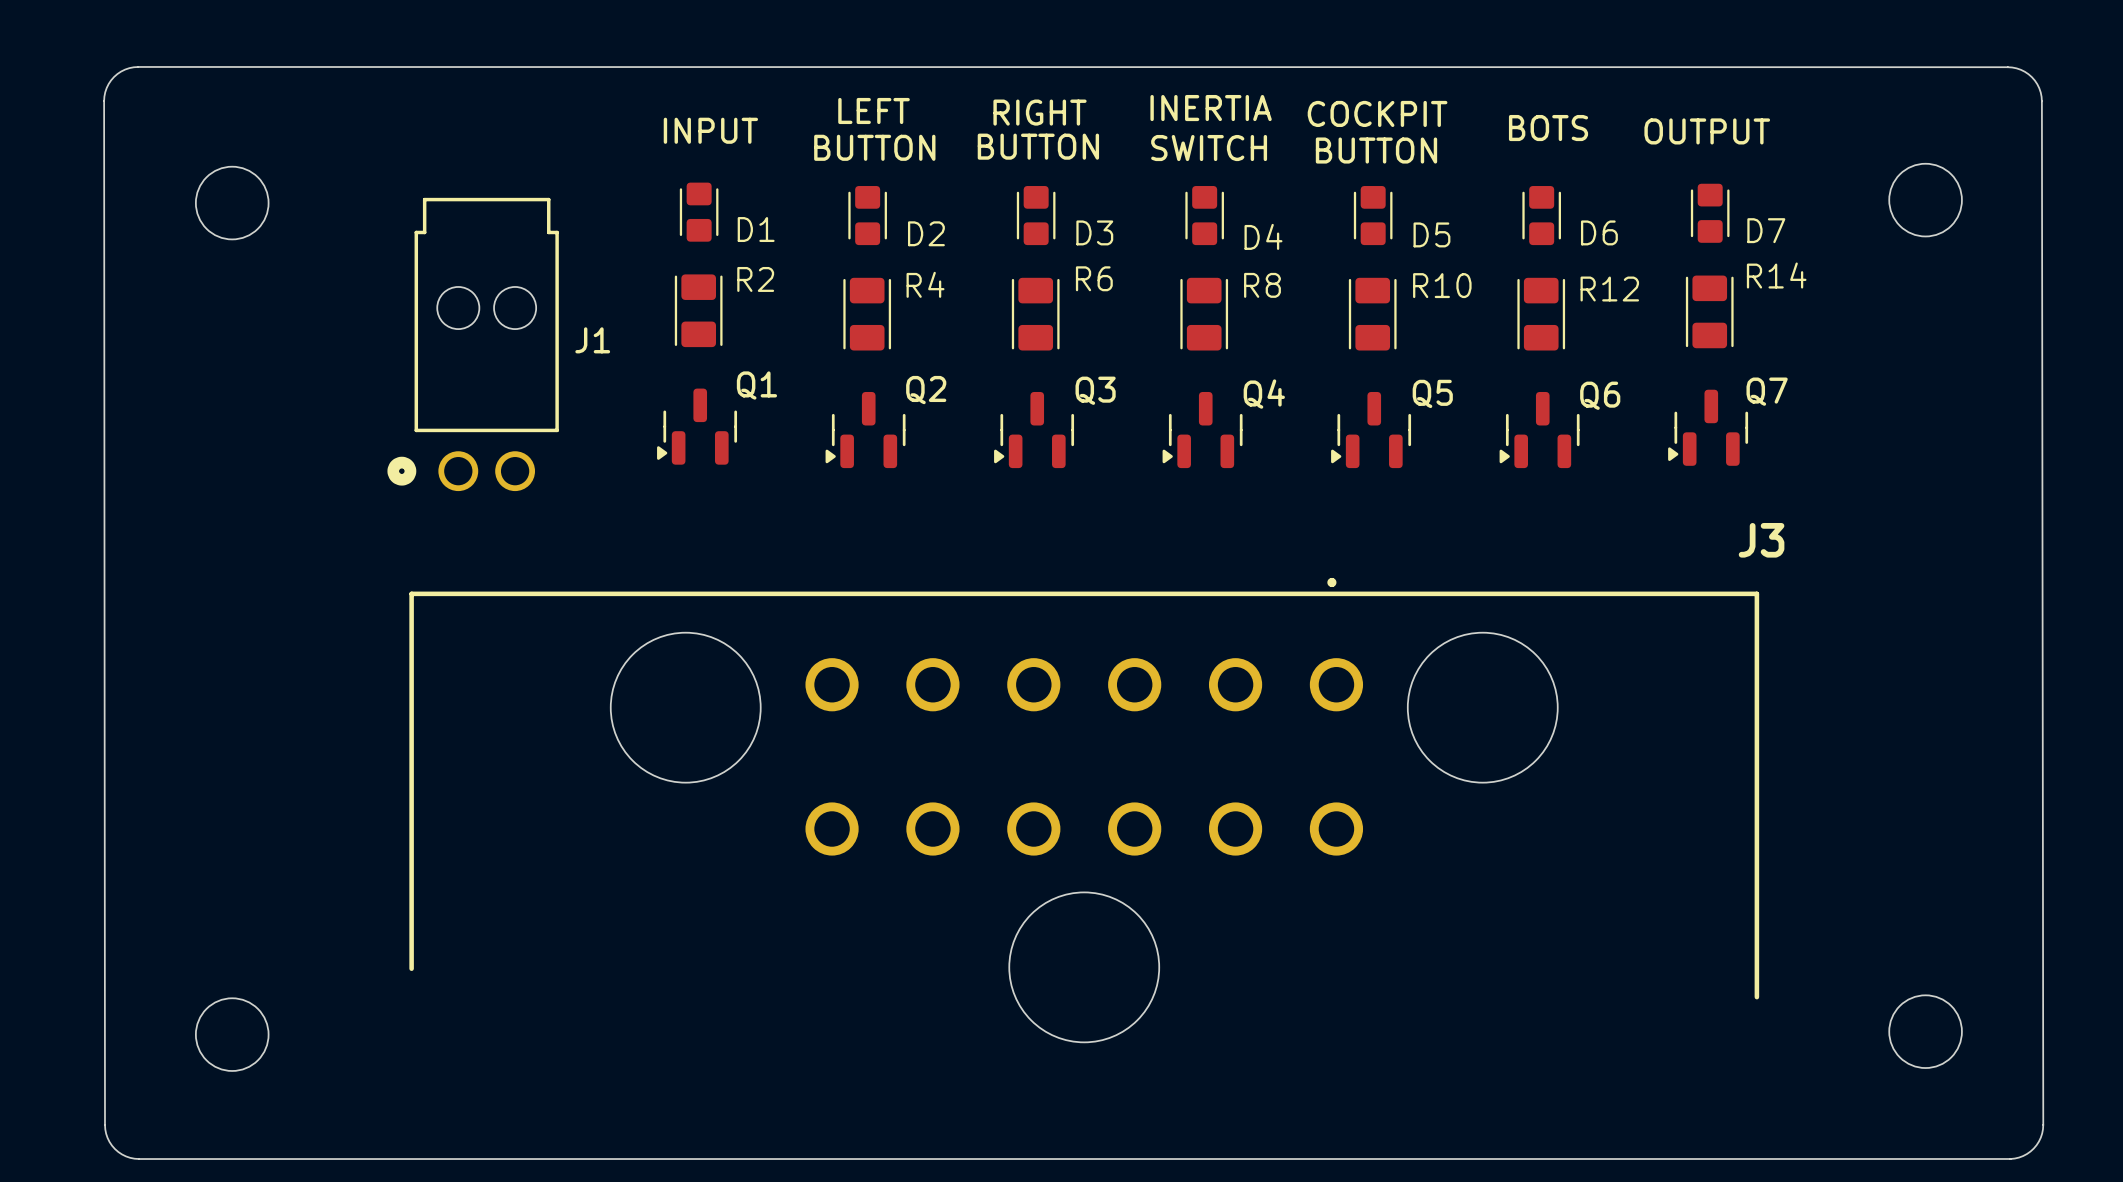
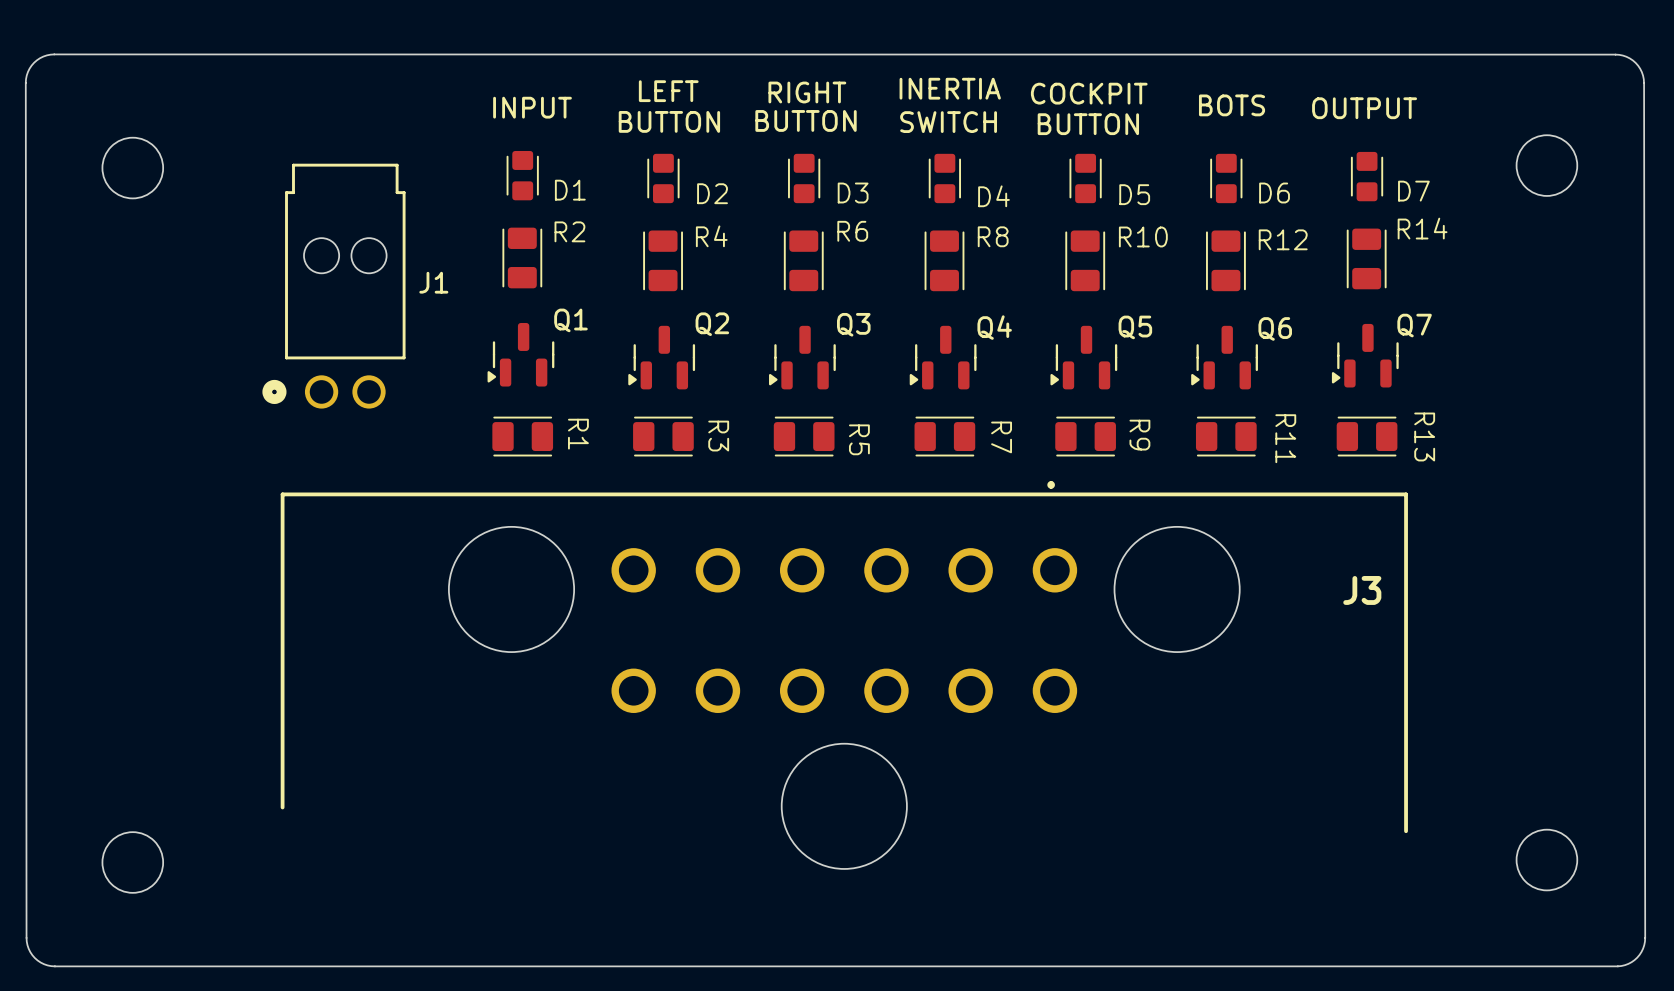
R1: none -> (522, 436)
R3: none -> (663, 436)
R5: none -> (804, 436)
R7: none -> (944, 436)
R9: none -> (1085, 436)
R11: none -> (1226, 436)
R13: none -> (1367, 436)
J3 name position: J3 (1761, 540) -> J3 (1362, 590)

